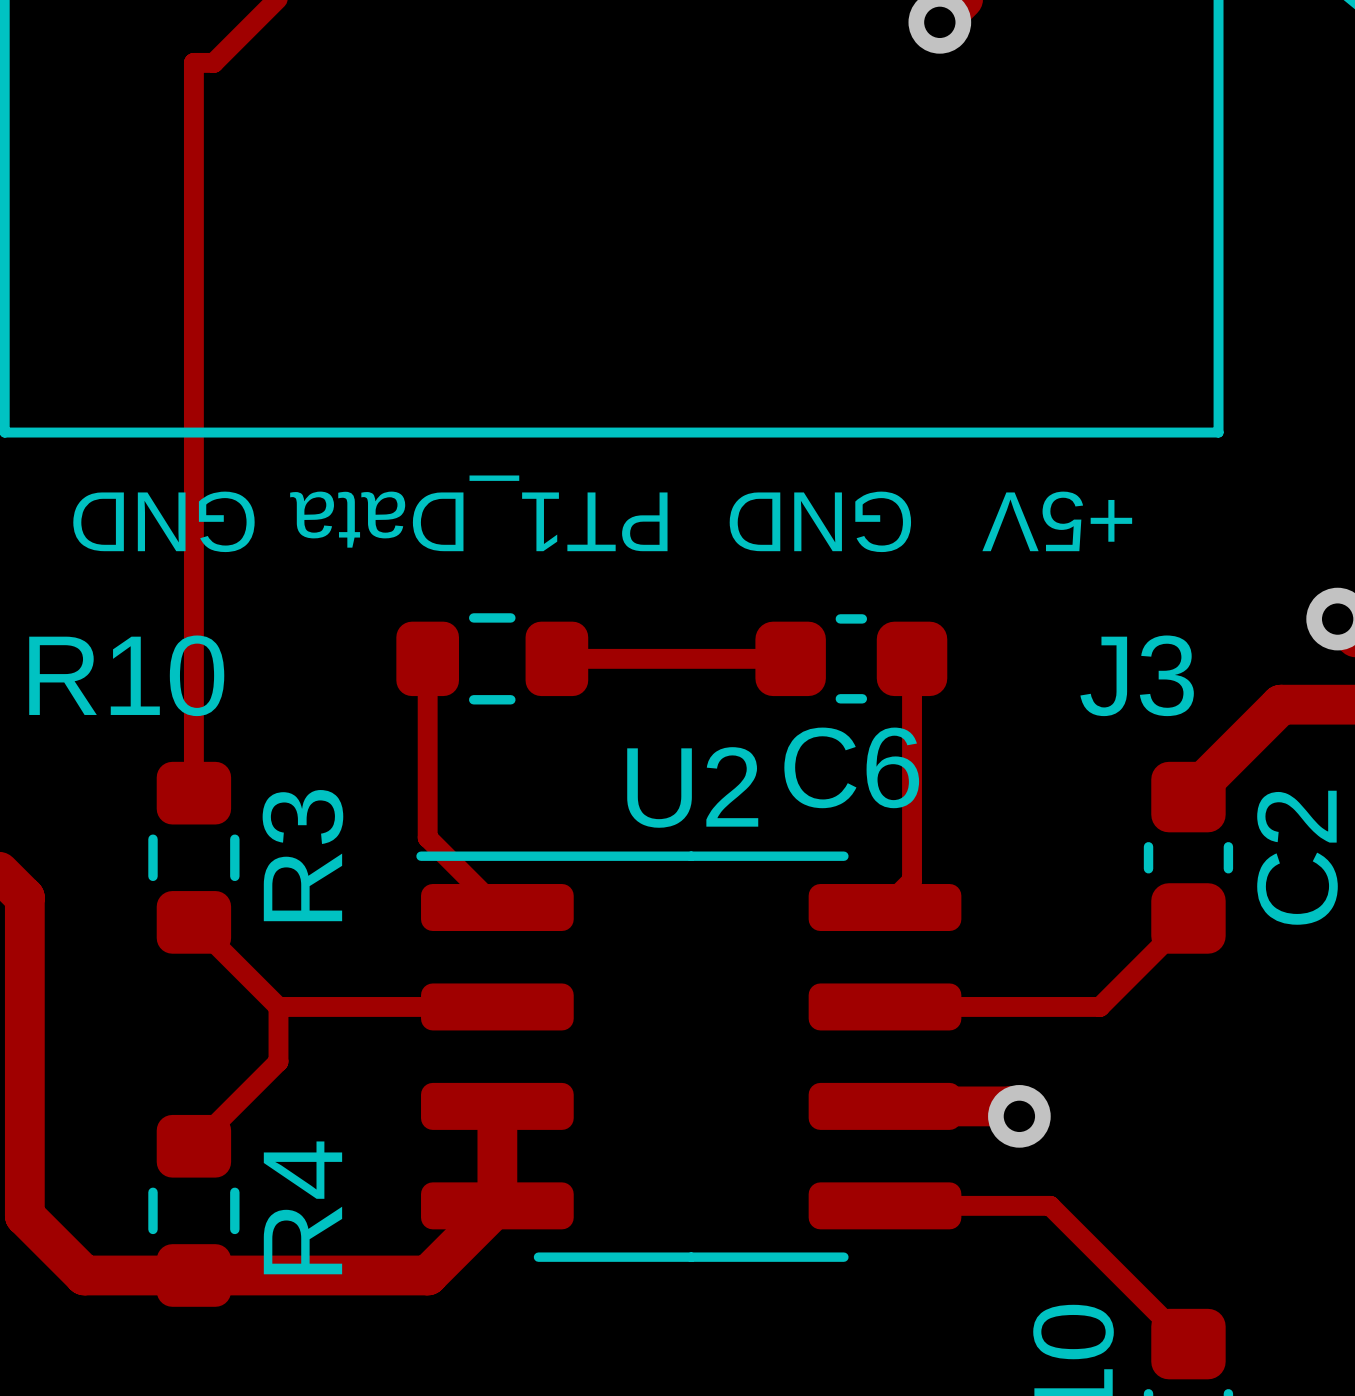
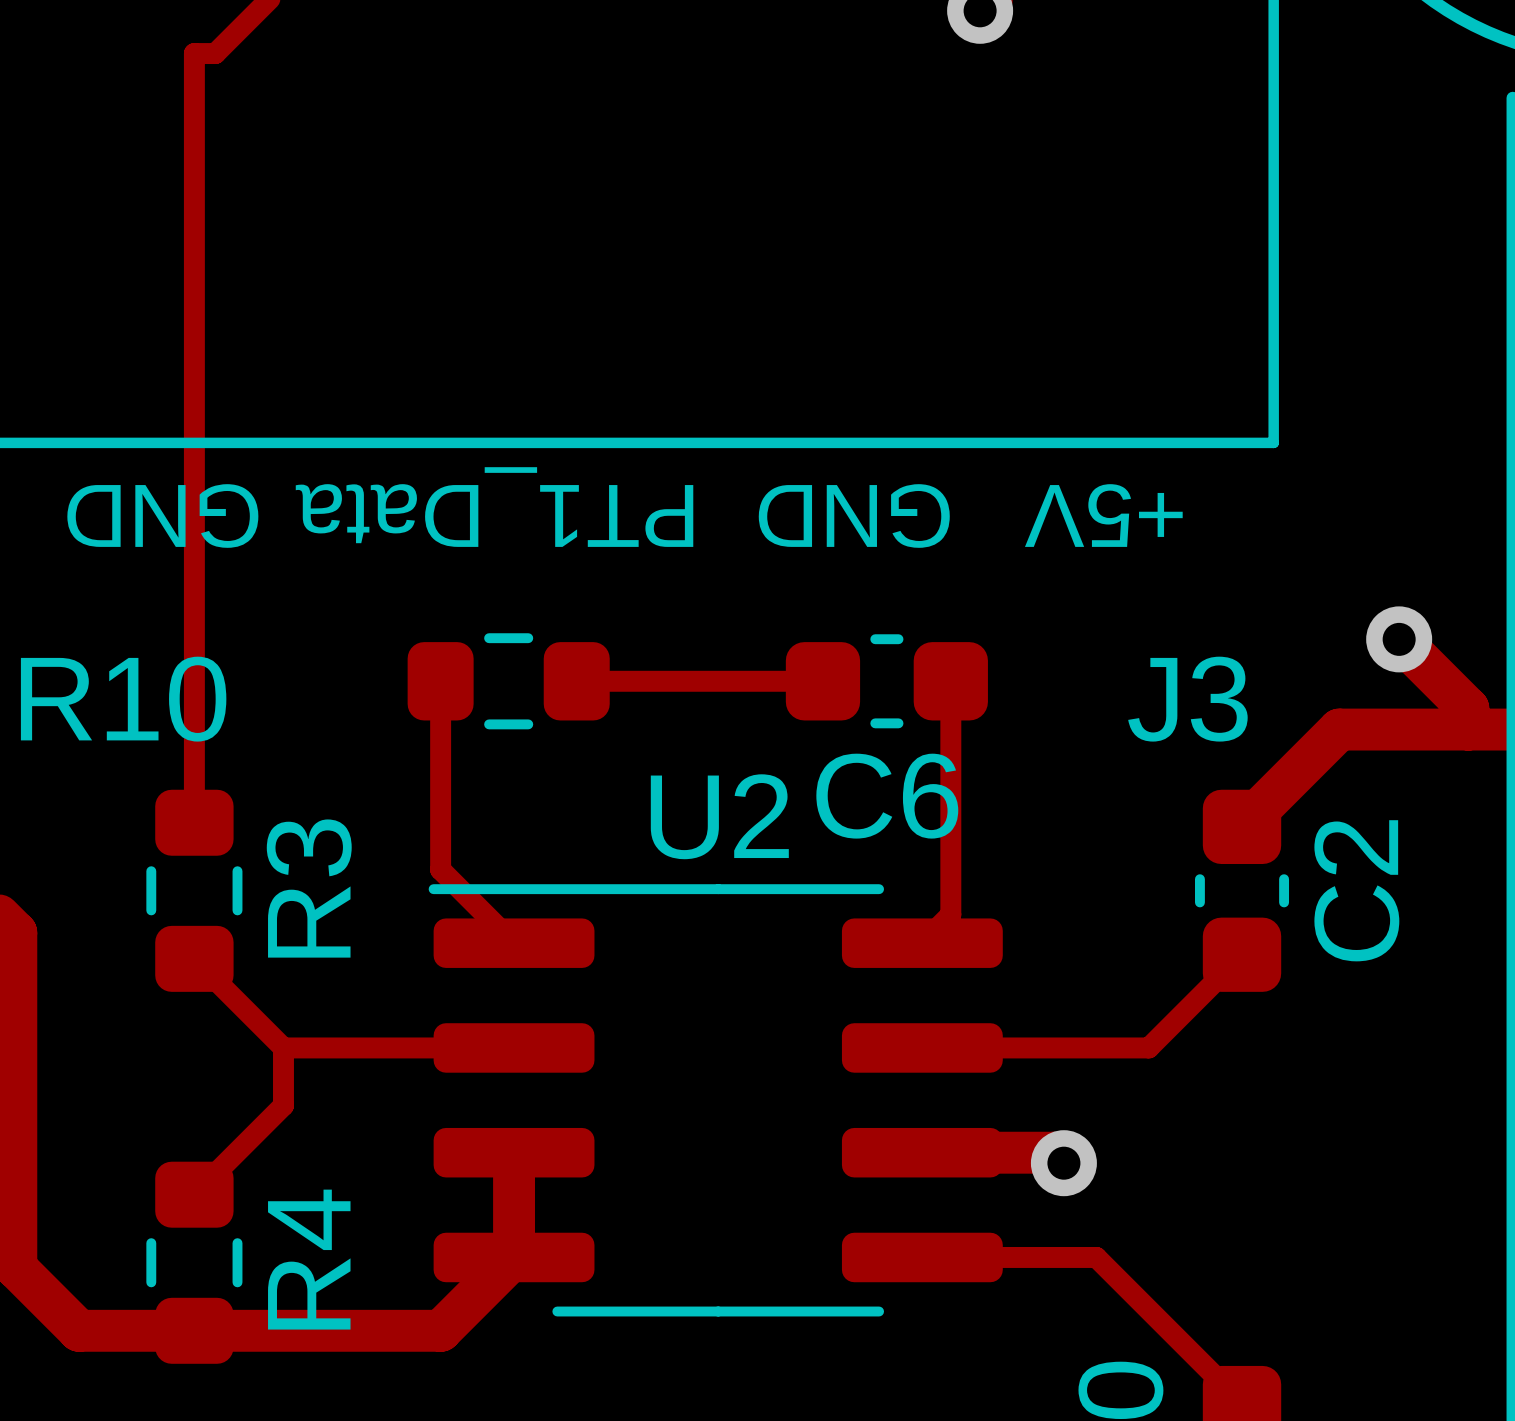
text position: PT1_Data (478, 513) -> PT1_Data (494, 507)
text position: GND (163, 521) -> GND (162, 516)
text position: GND (820, 521) -> GND (854, 516)
text position: +5V (1057, 521) -> +5V (1103, 515)

